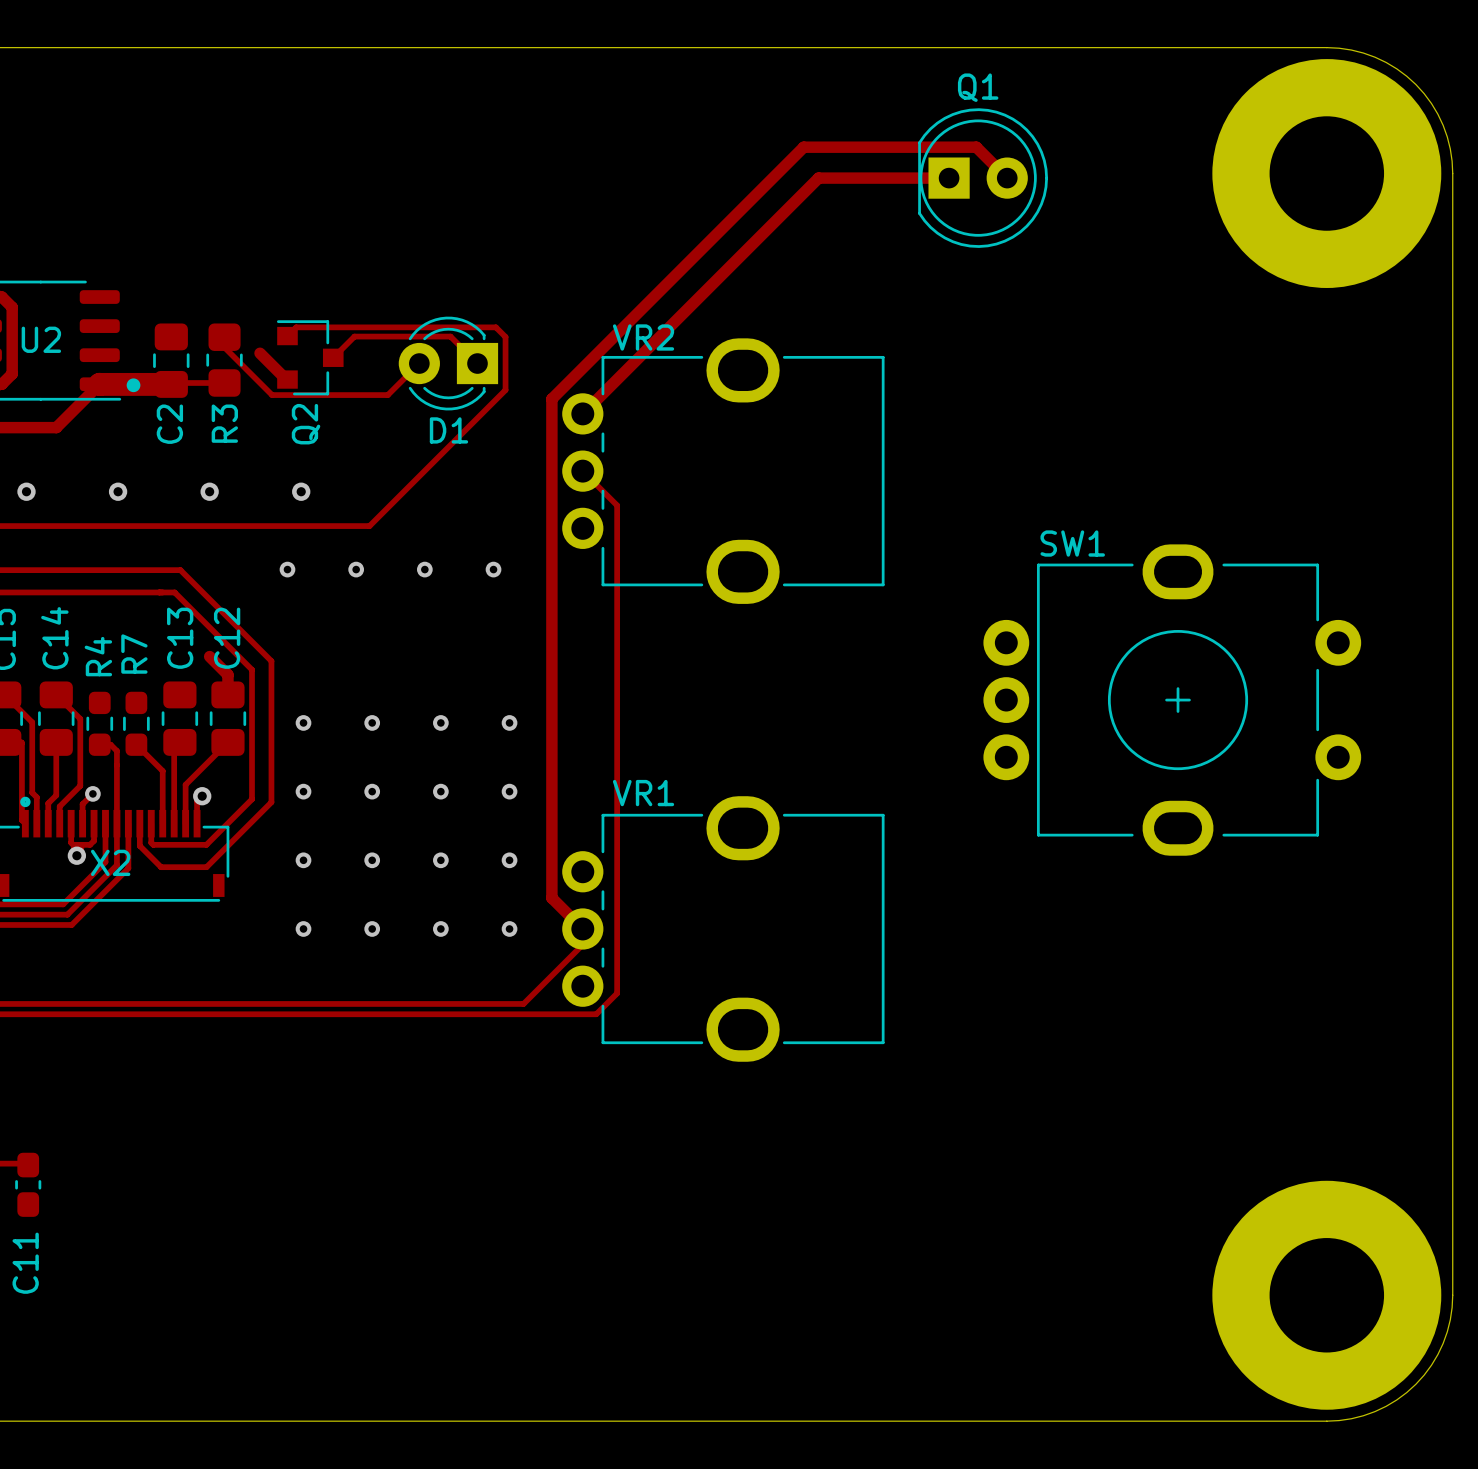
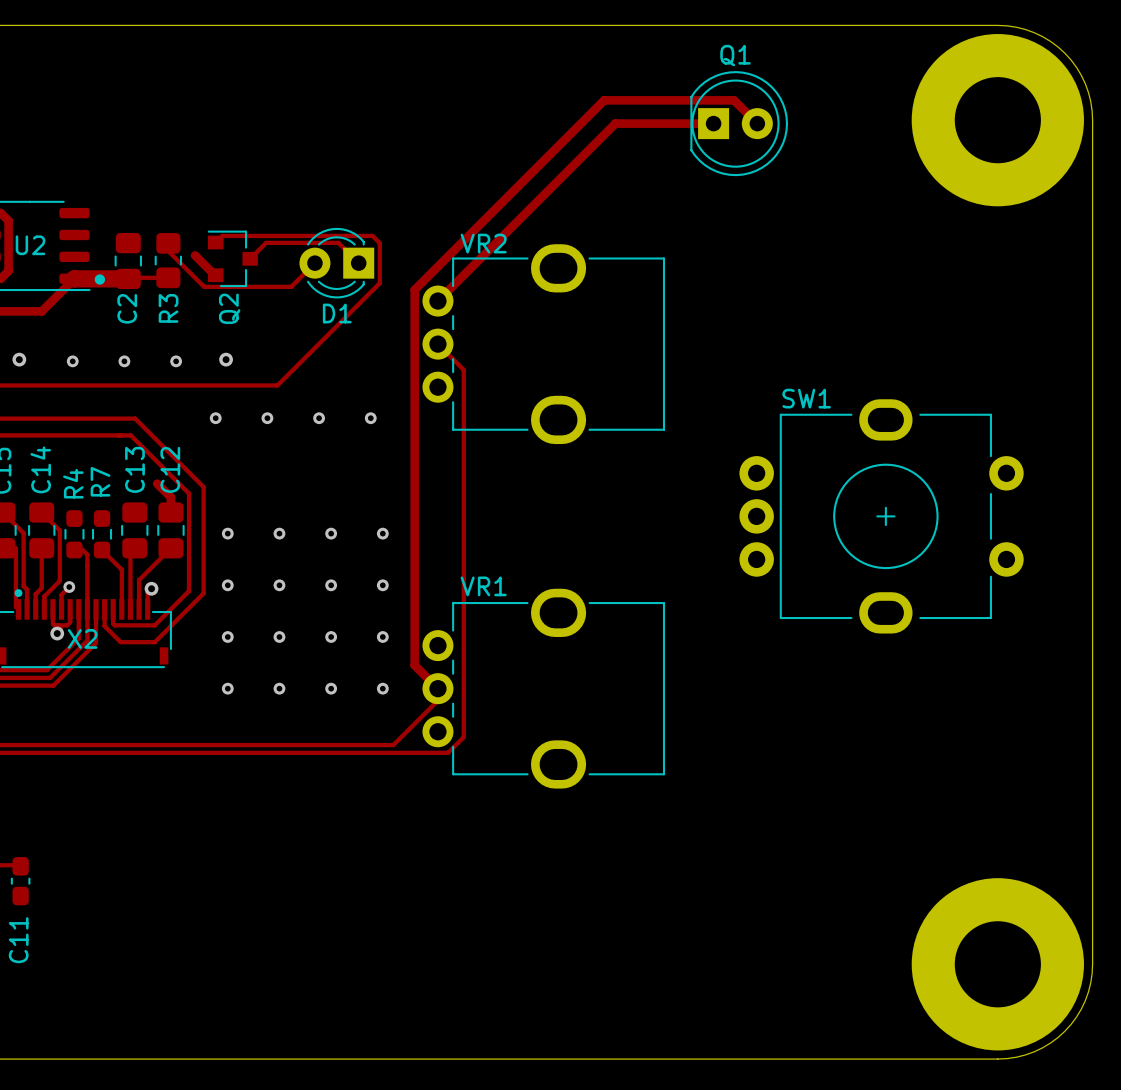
via: (118, 491) -> none
via: (209, 491) -> none
via: none -> (72, 361)
via: none -> (124, 361)
via: none -> (176, 361)

